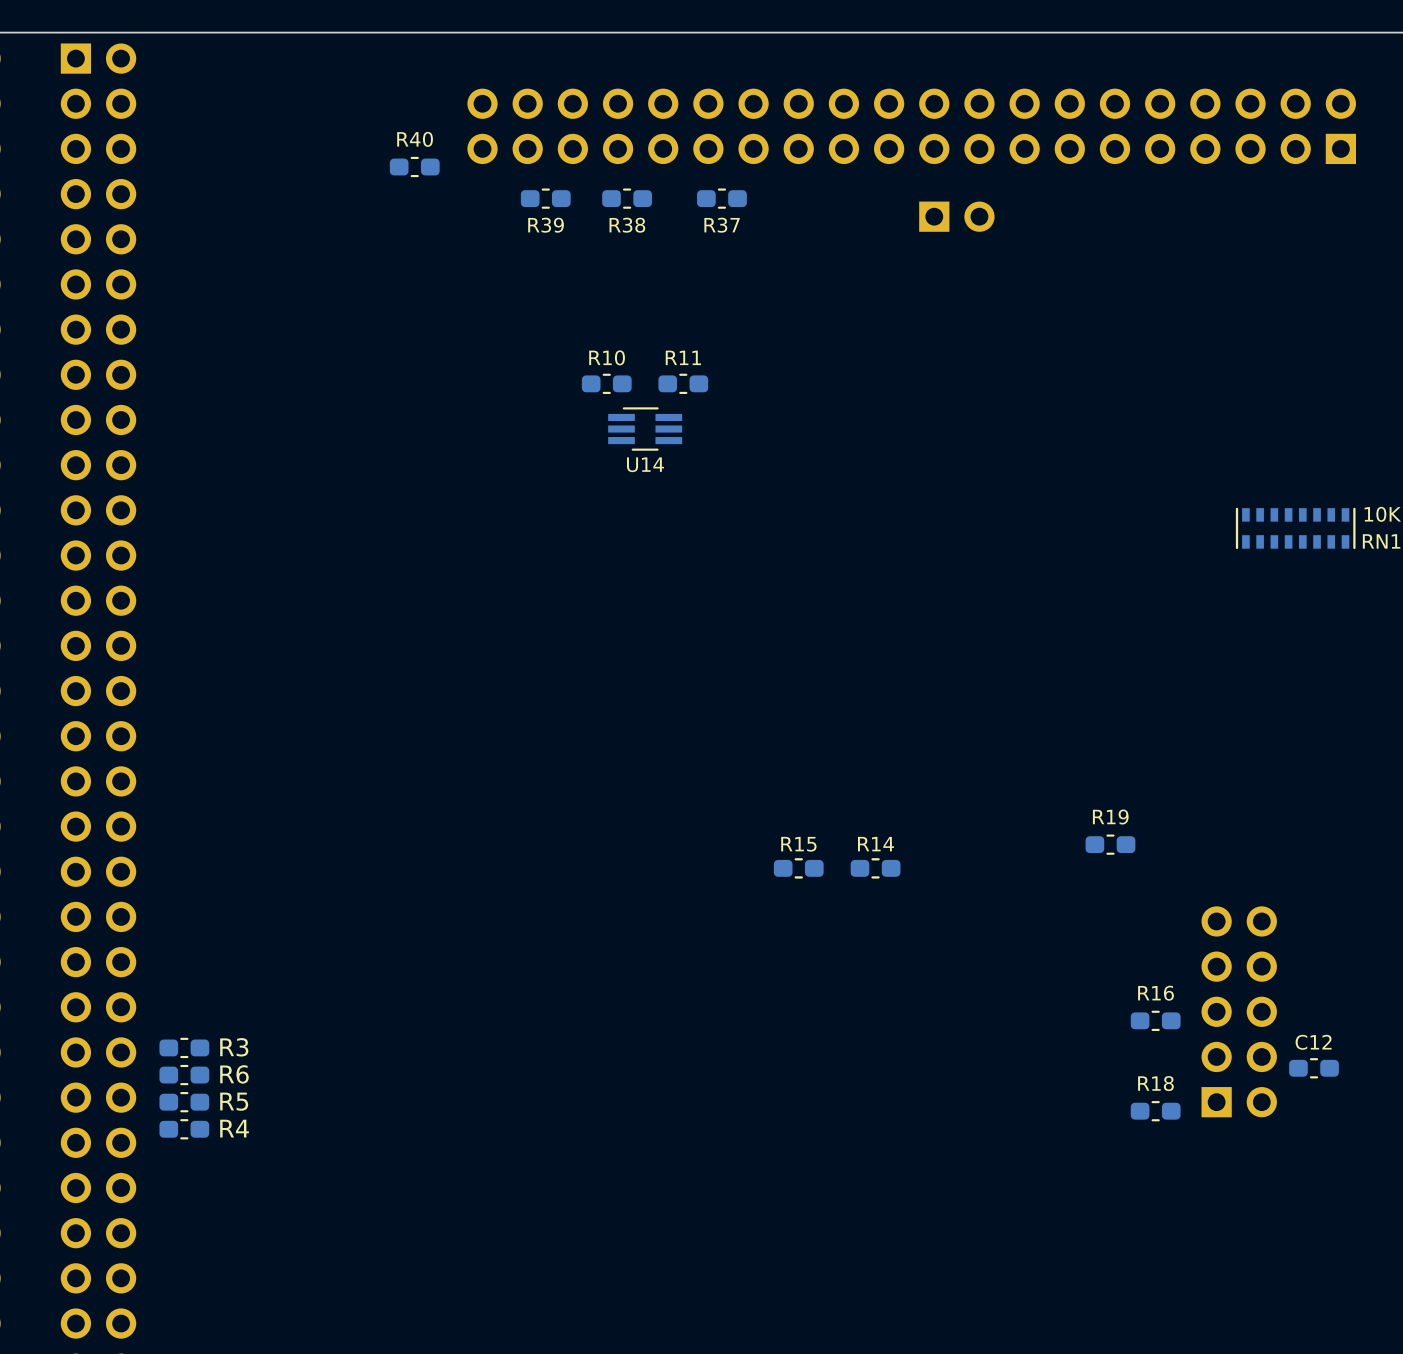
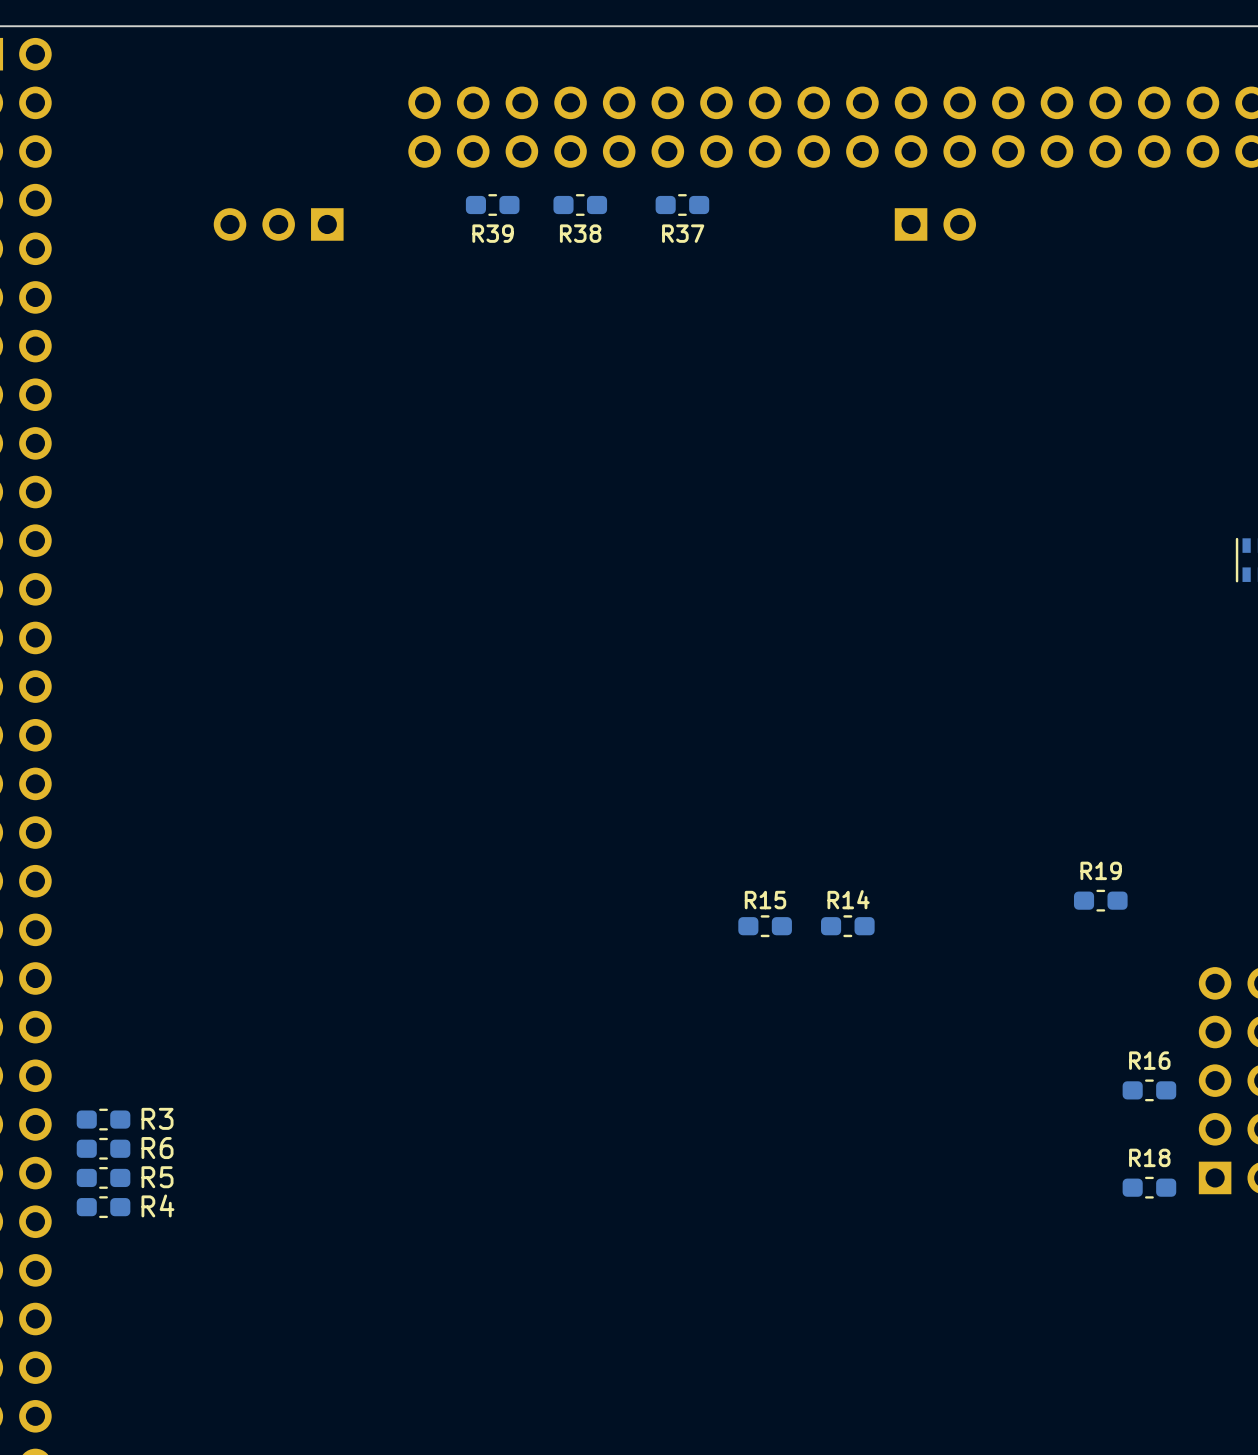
R40: (414, 167) -> none
part: none -> (278, 224)
R10: (606, 383) -> none
R11: (683, 383) -> none
U14: (645, 429) -> none

